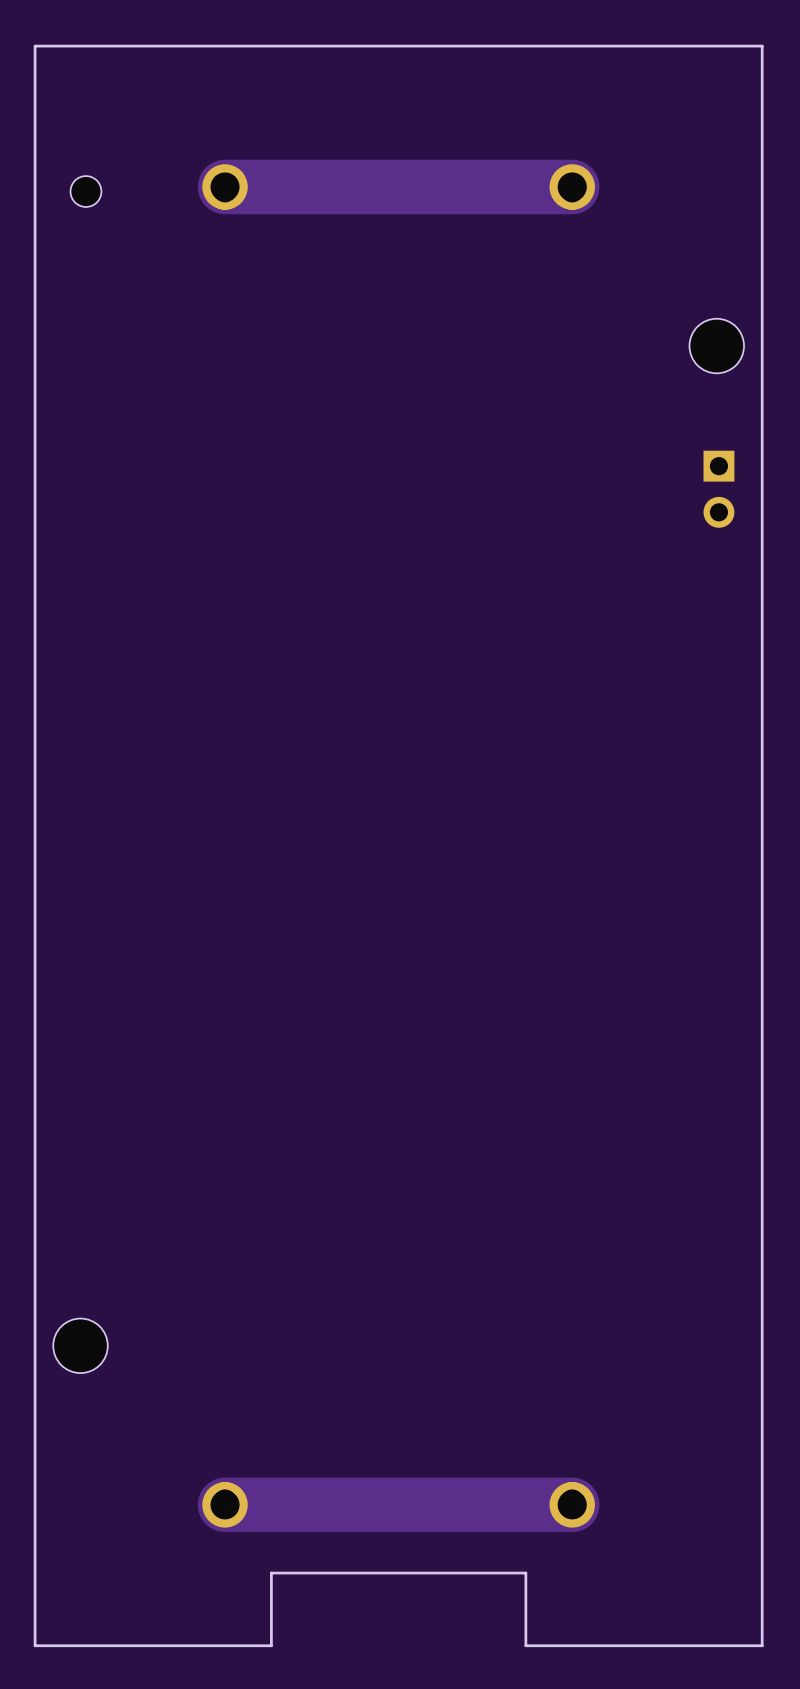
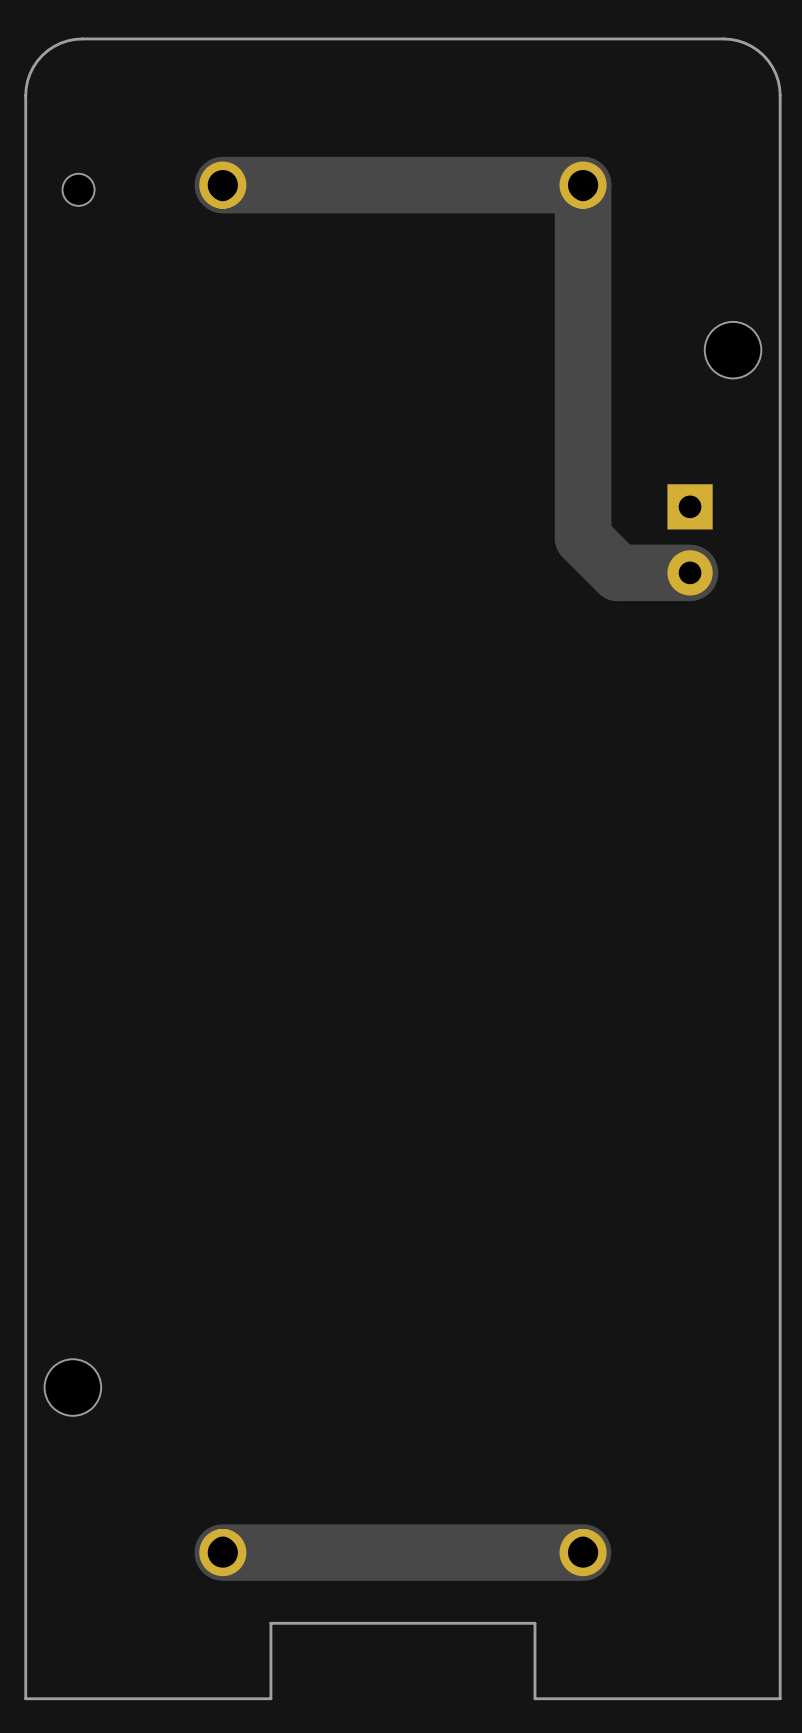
board edge: (89, 46) (35, 46) (35, 100) -> (82, 38) (60, 43) (42, 55) (30, 73) (25, 95)
board edge: (707, 46) (762, 46) (762, 100) -> (723, 38) (745, 43) (763, 55) (775, 73) (780, 95)
track: none -> (583, 185) (583, 537) (618, 572) (690, 572)
part: (718, 489) -> none
part: none -> (690, 539)

